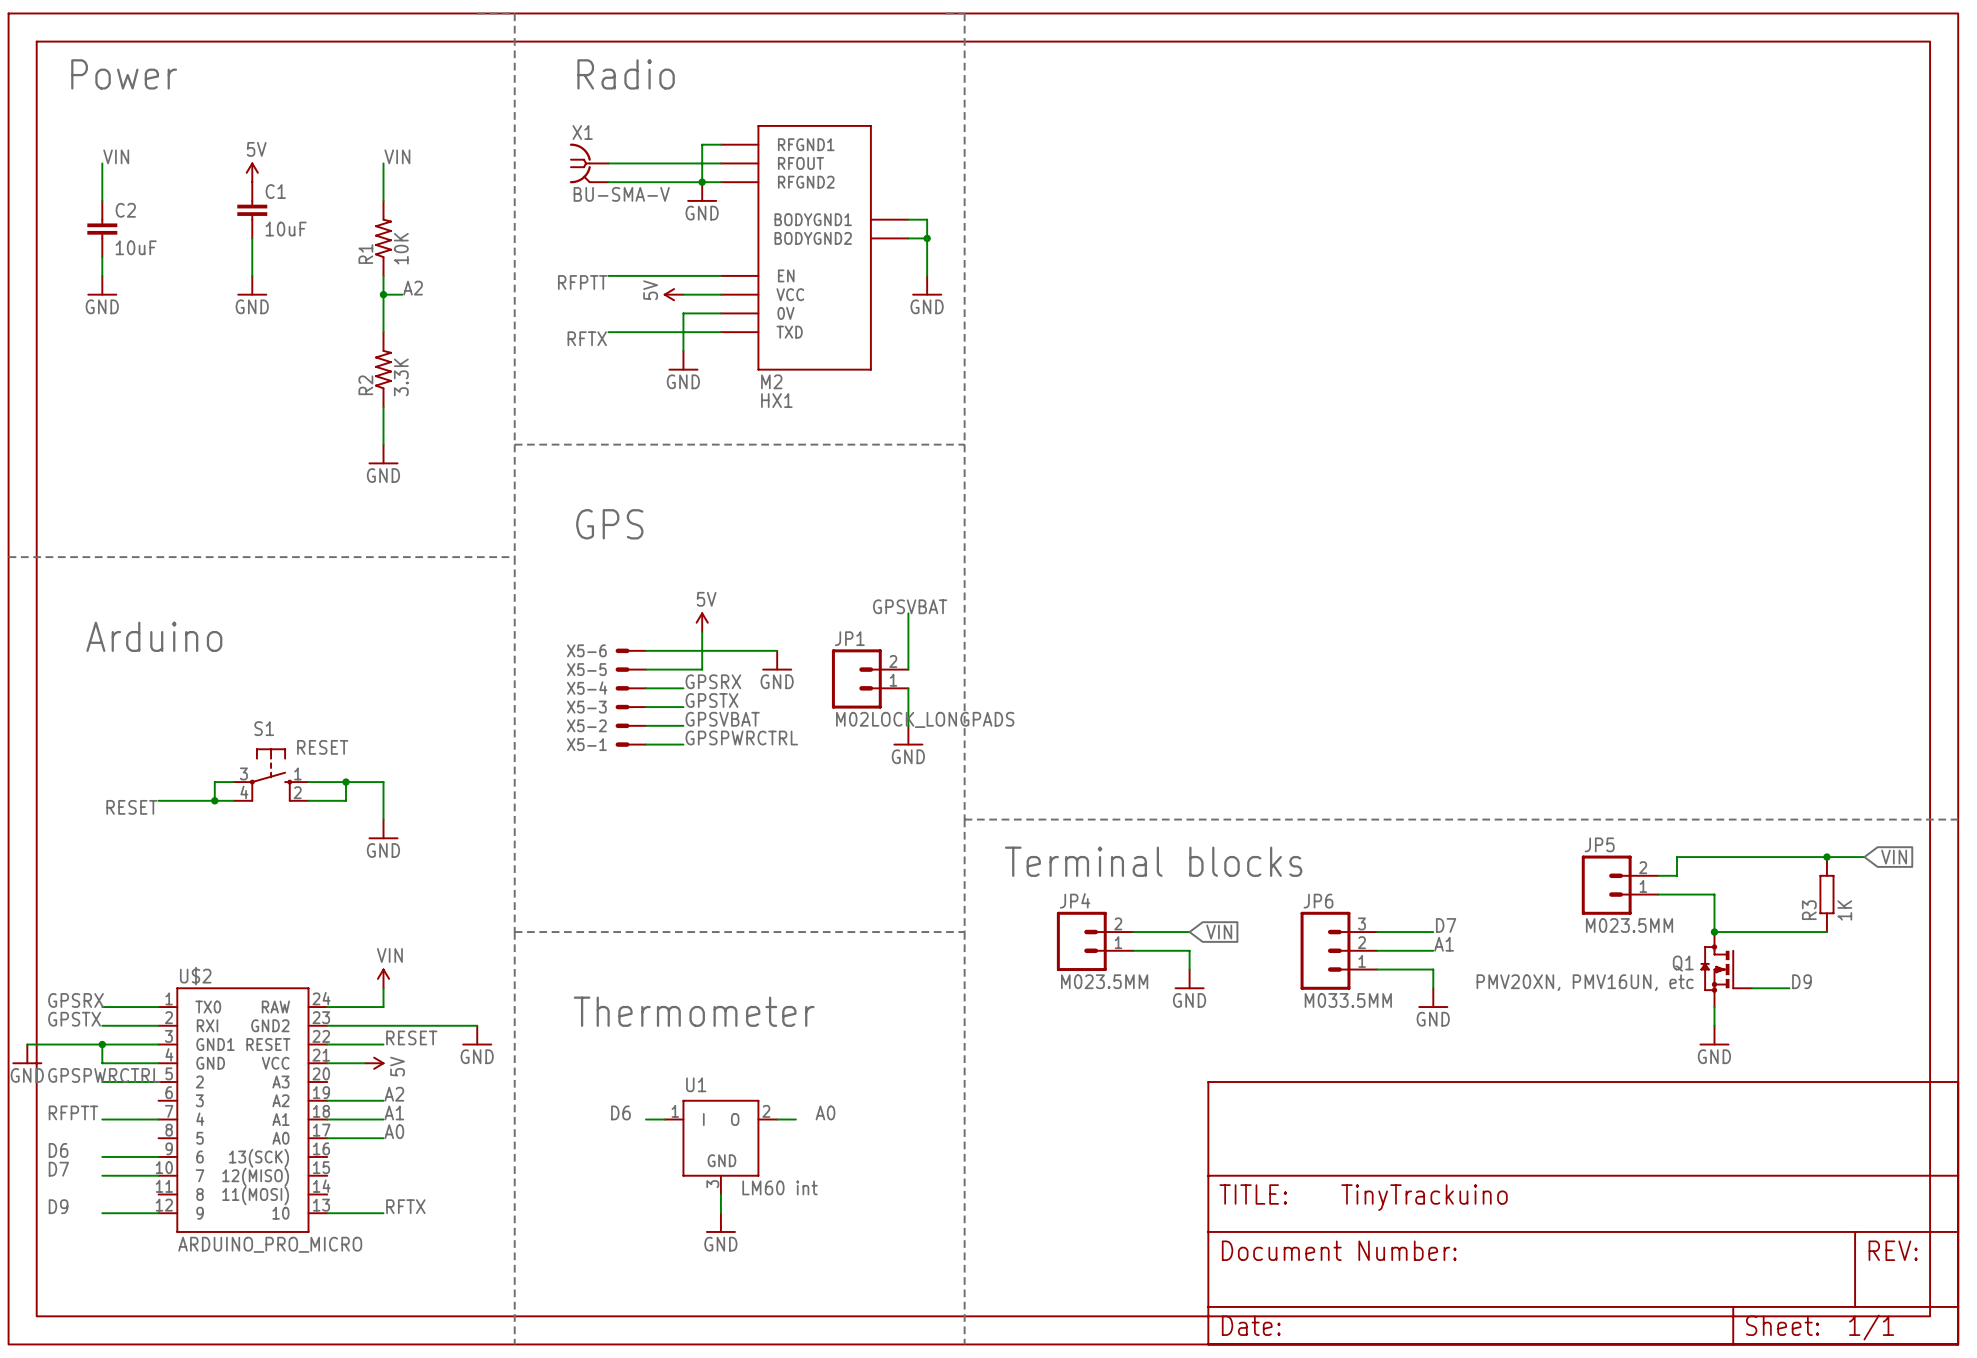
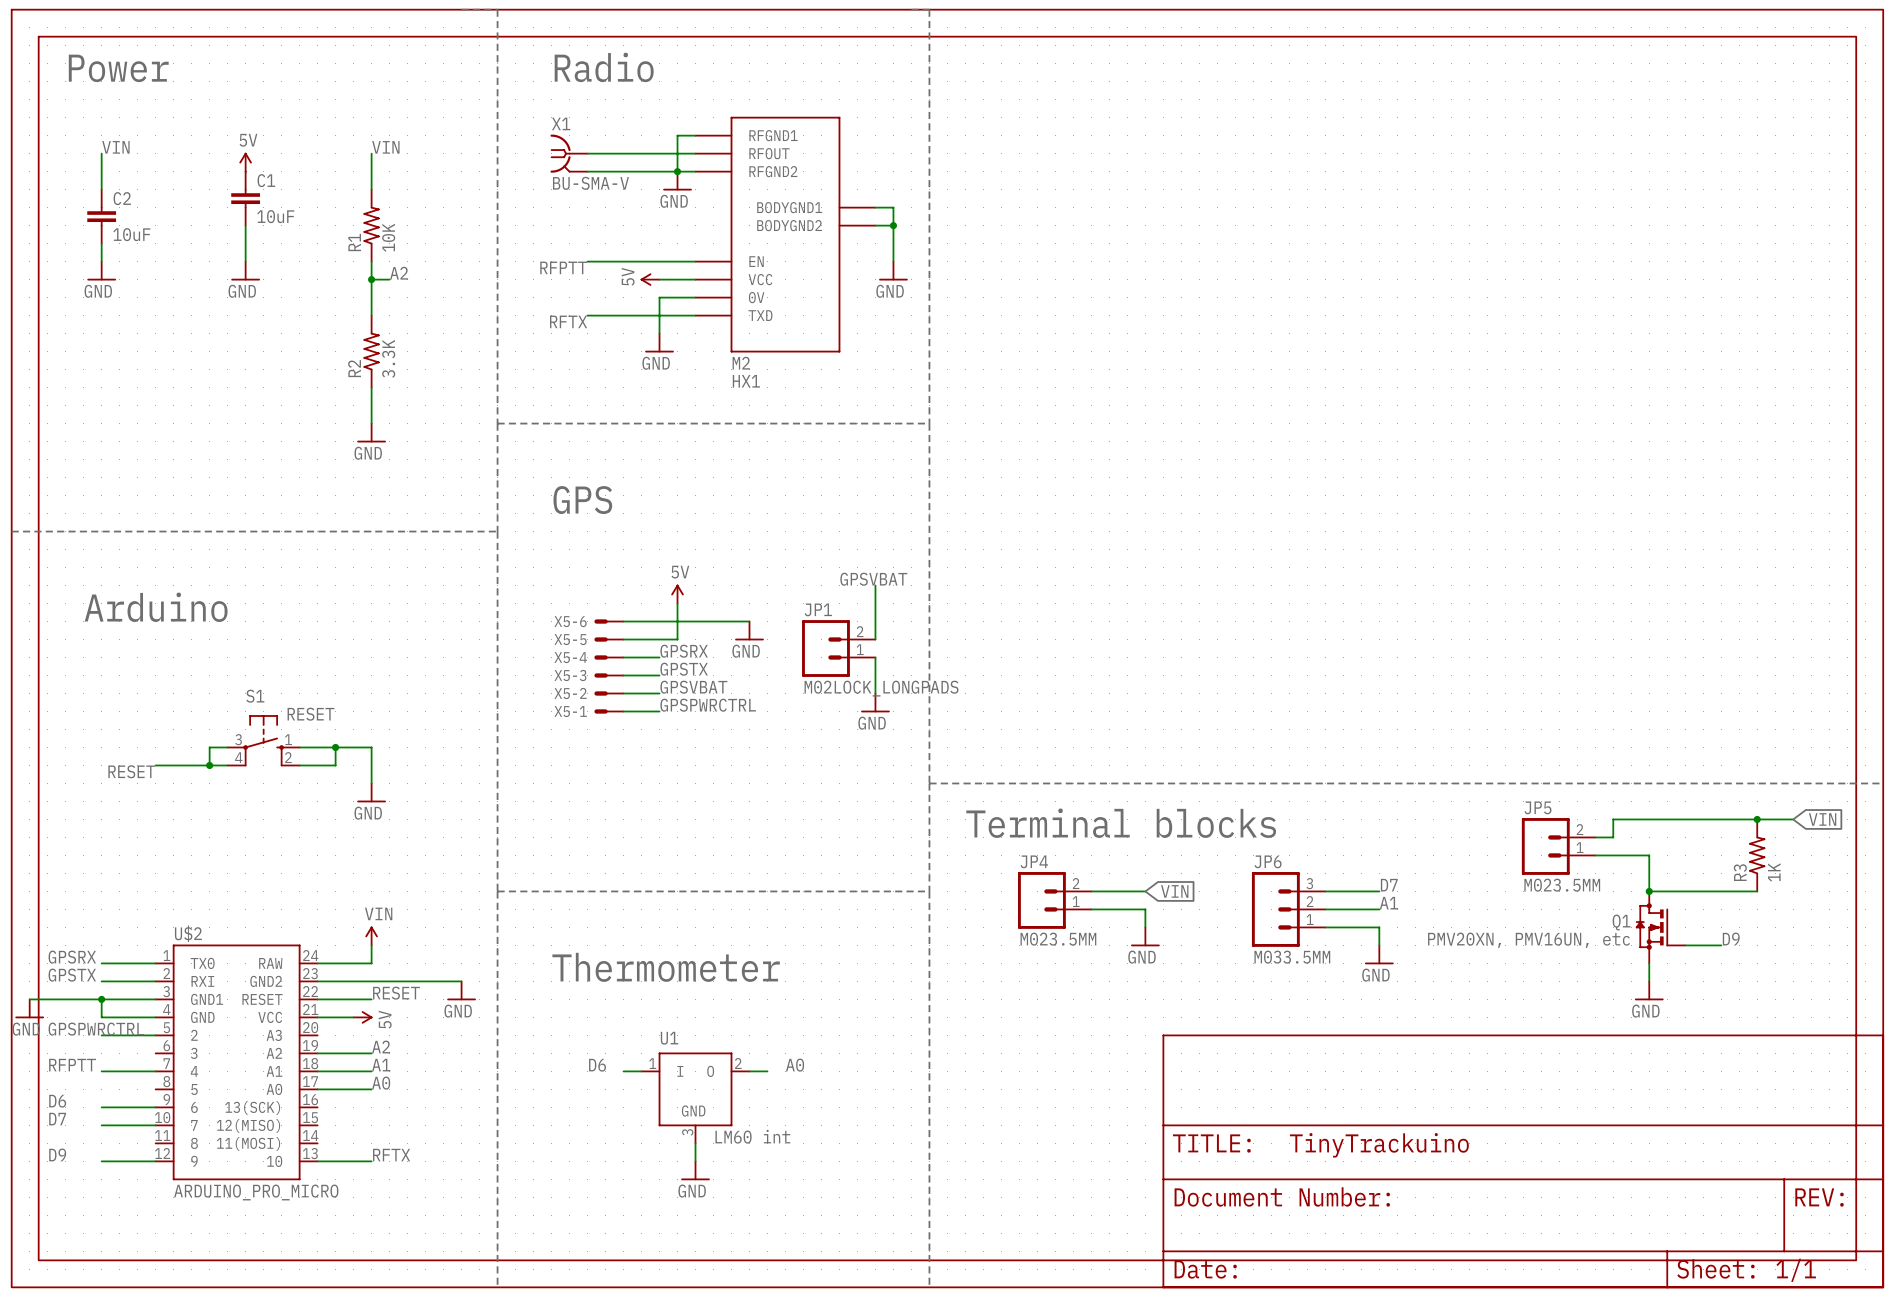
R3 symbol: [1819, 857, 1835, 933] -> [1749, 819, 1765, 892]

